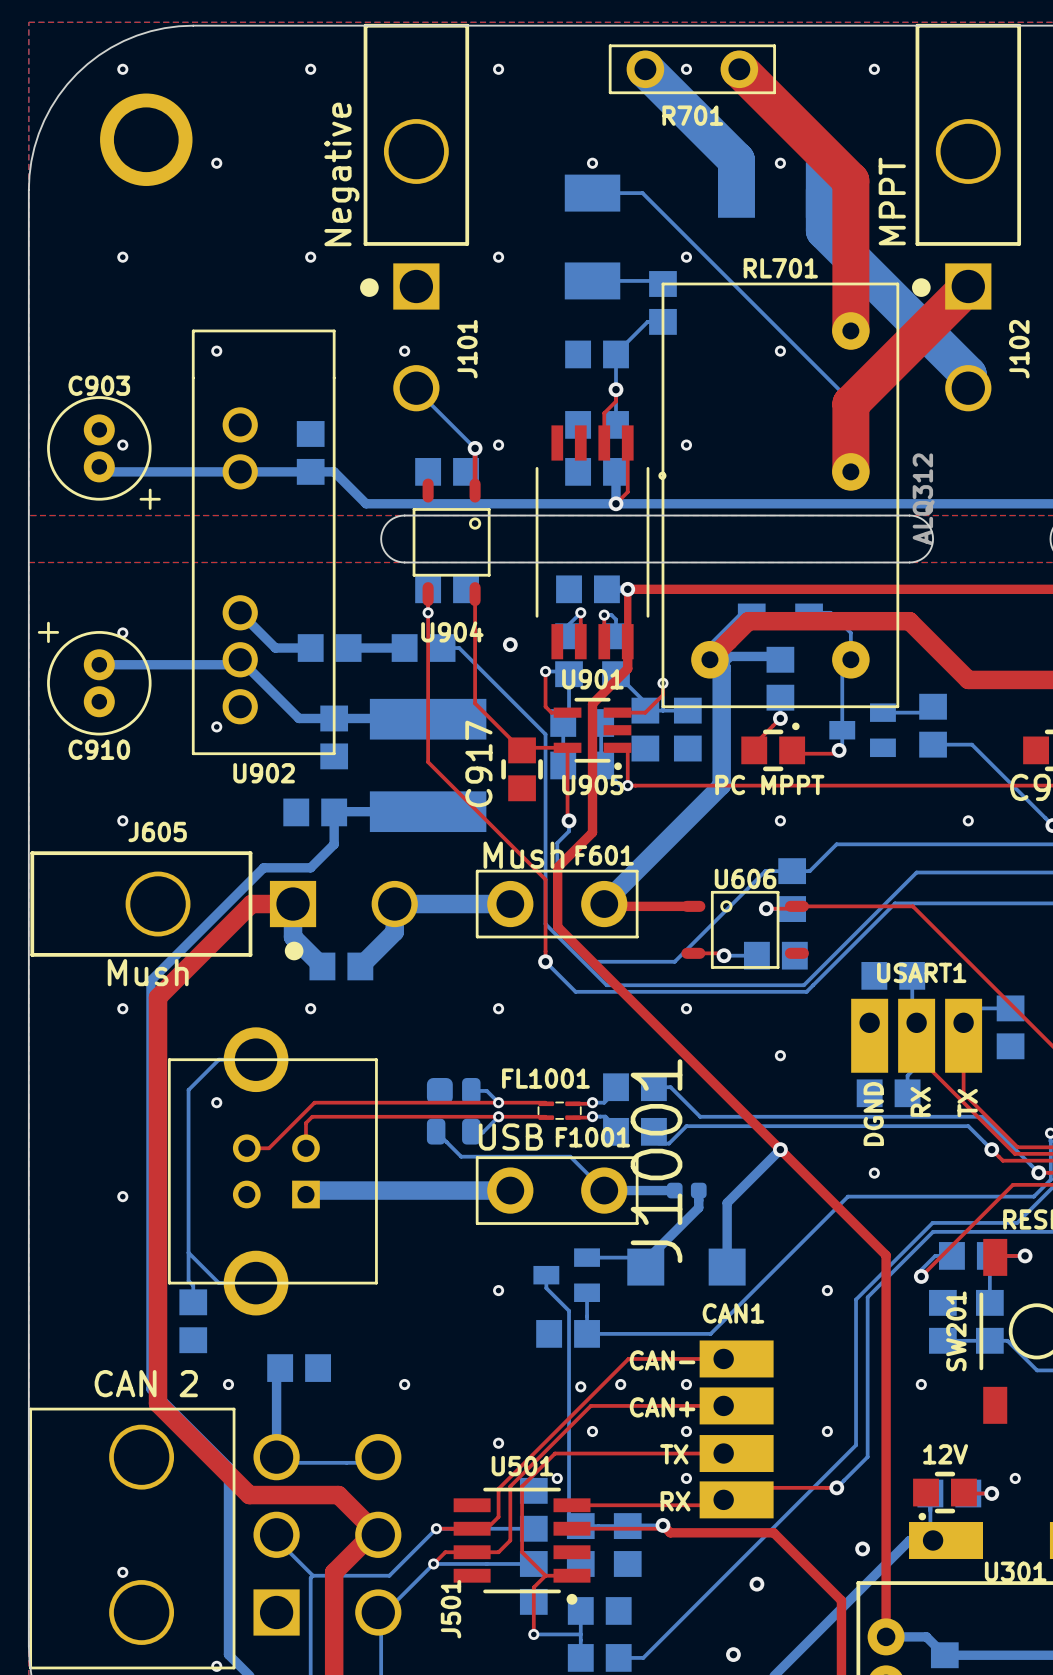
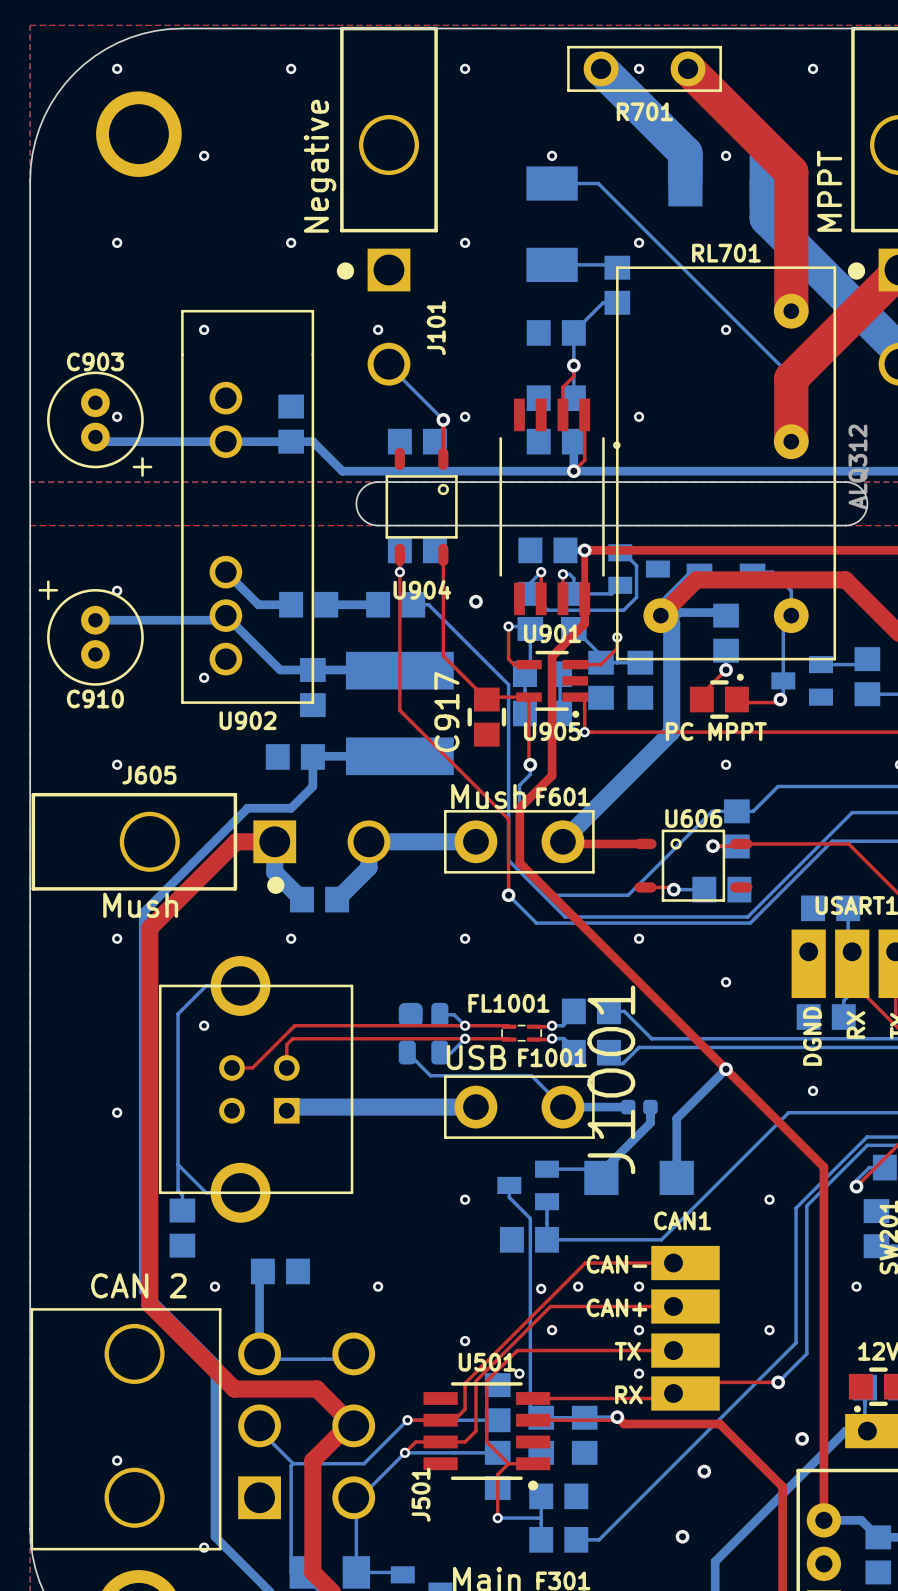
bottom track: none -> (620, 552) (623, 552) (636, 565) (636, 597) (623, 610) (547, 610) (530, 593)
part: none -> (639, 569)
bottom track: none -> (620, 585) (611, 593) (573, 593)

